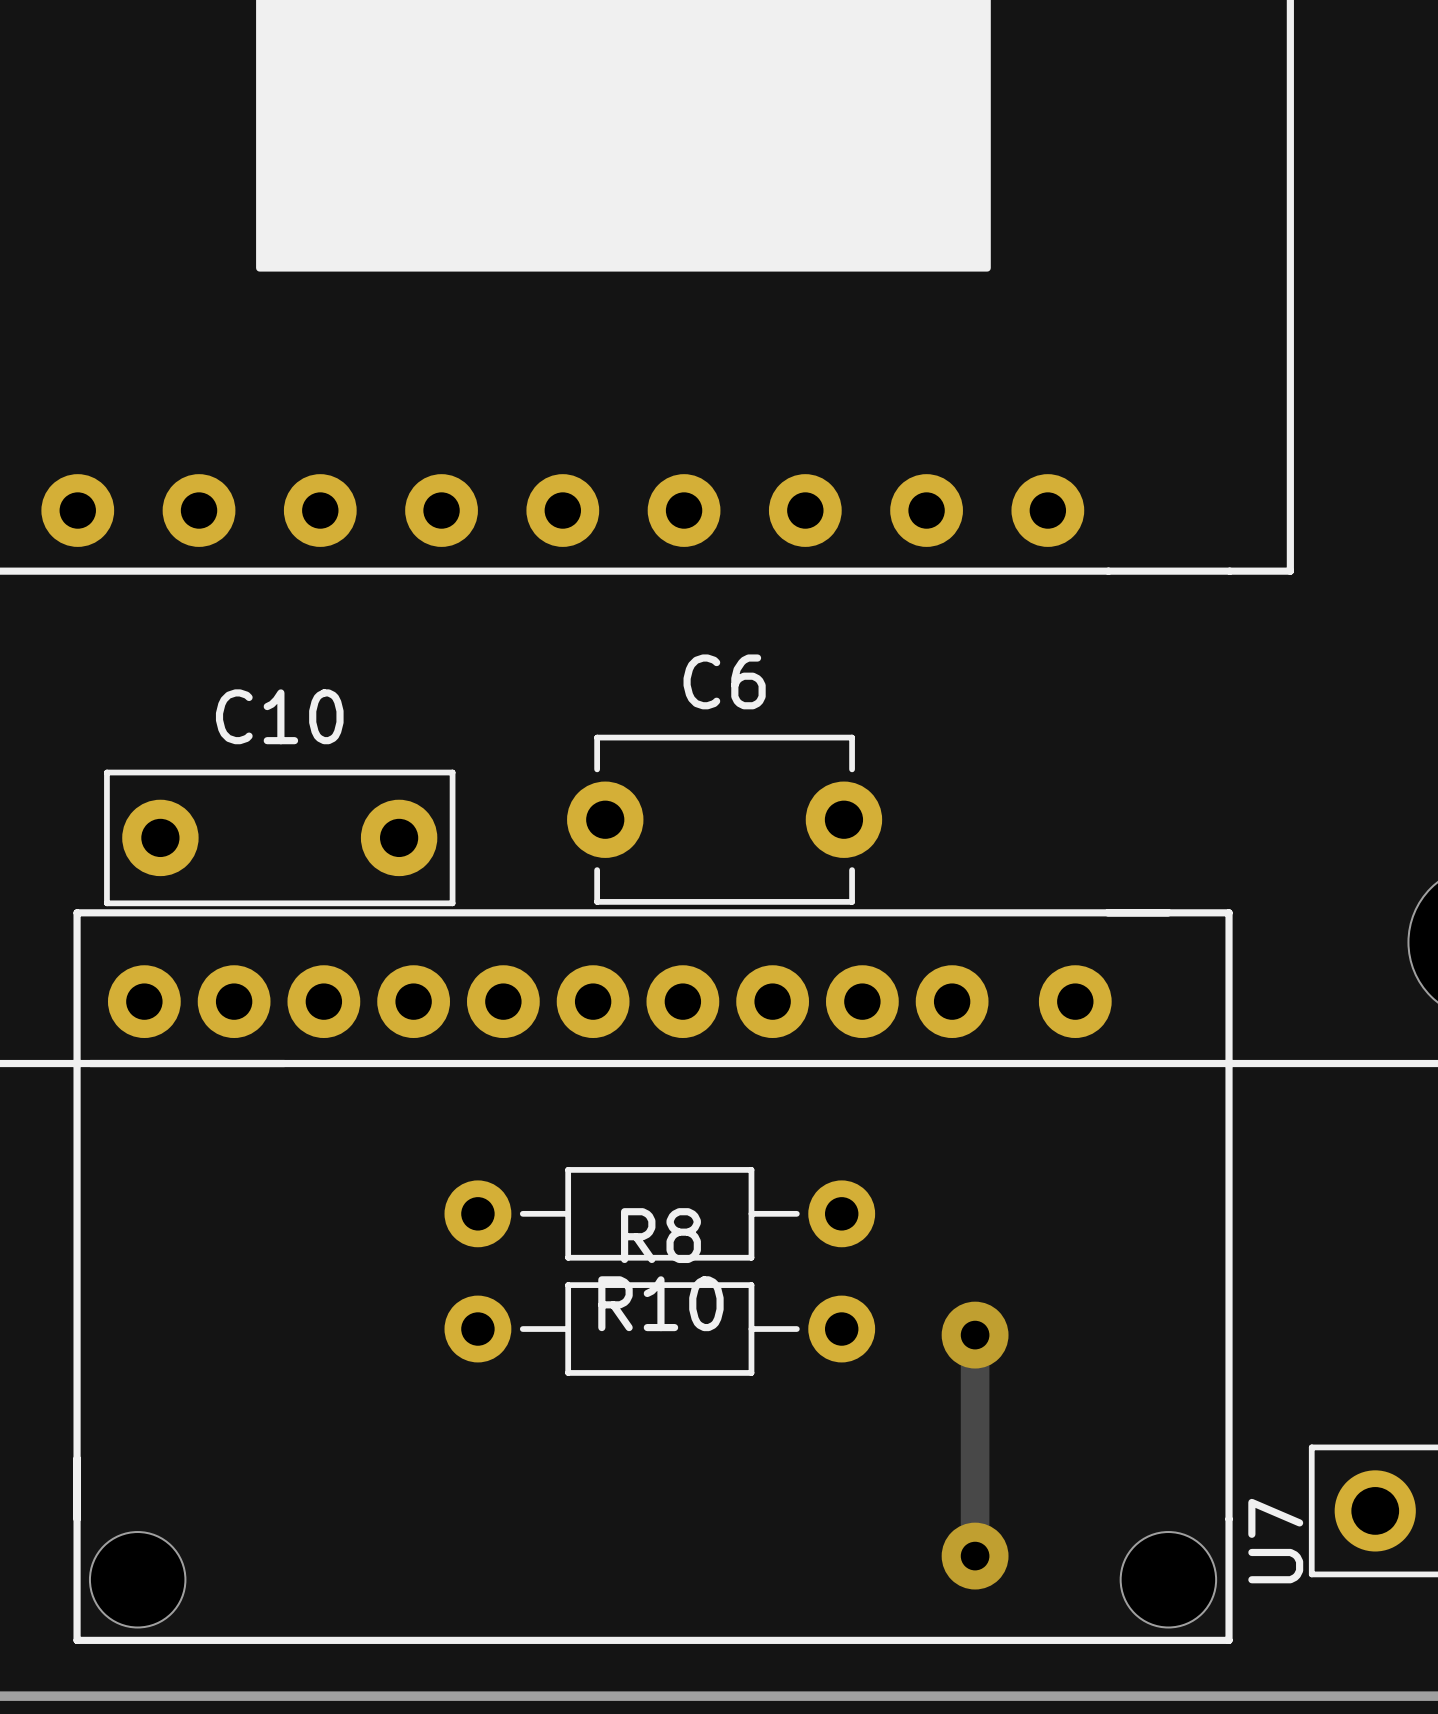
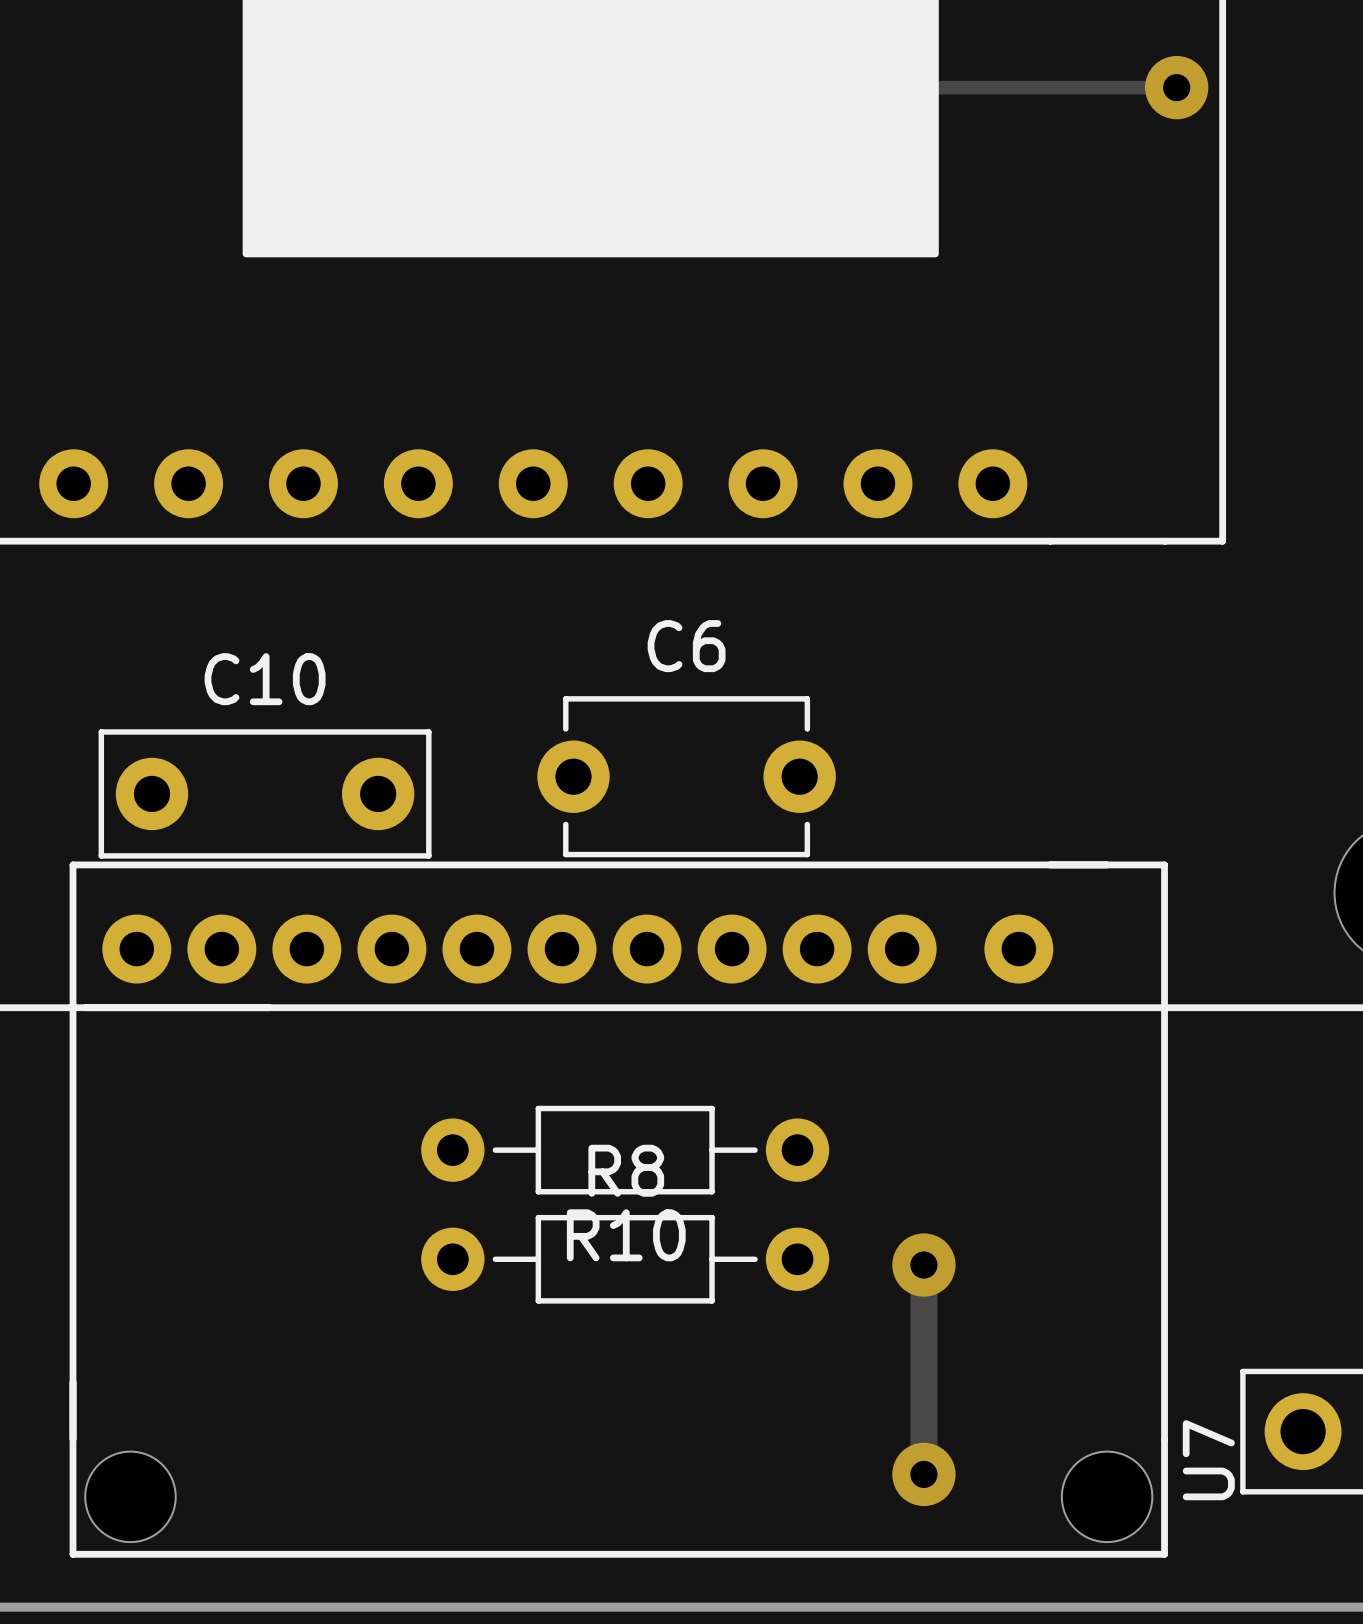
track: none -> (880, 87) (1176, 87)
via: none -> (1176, 87)

